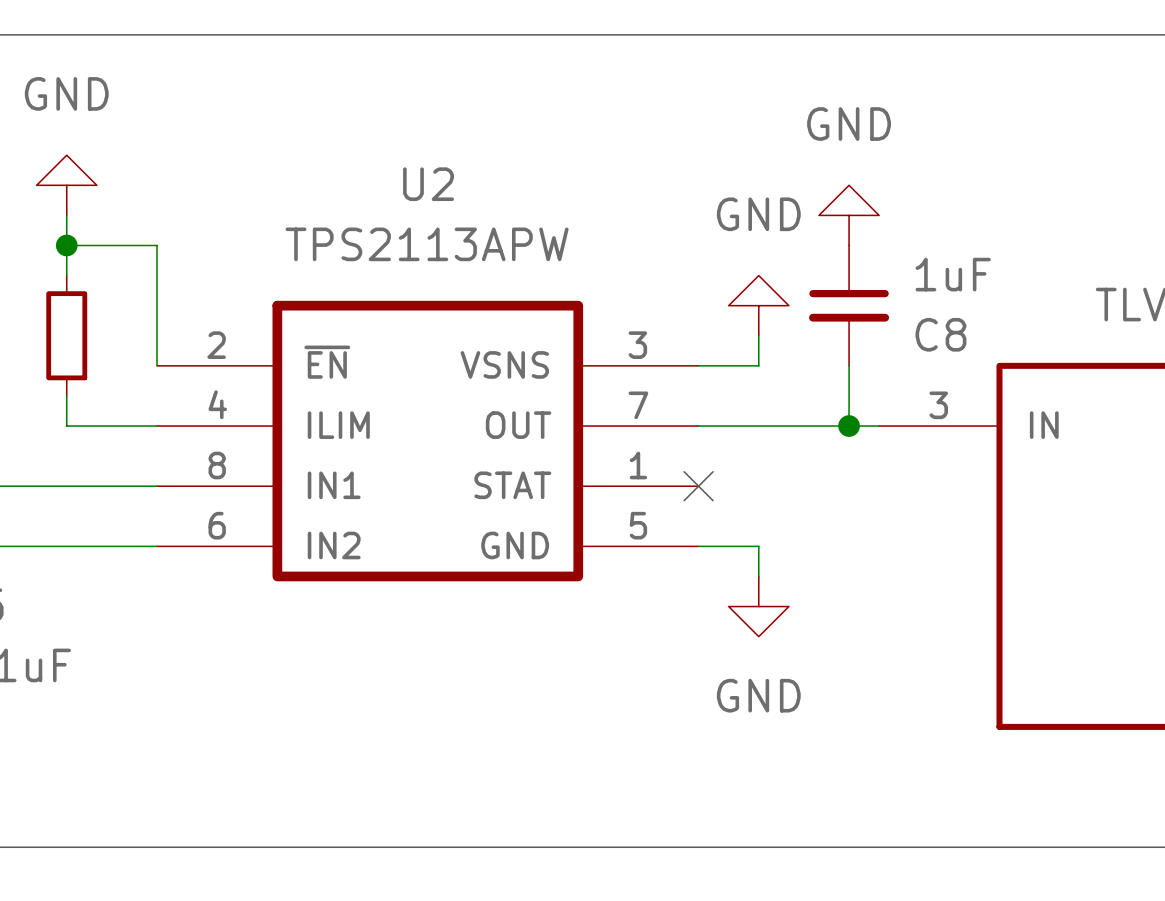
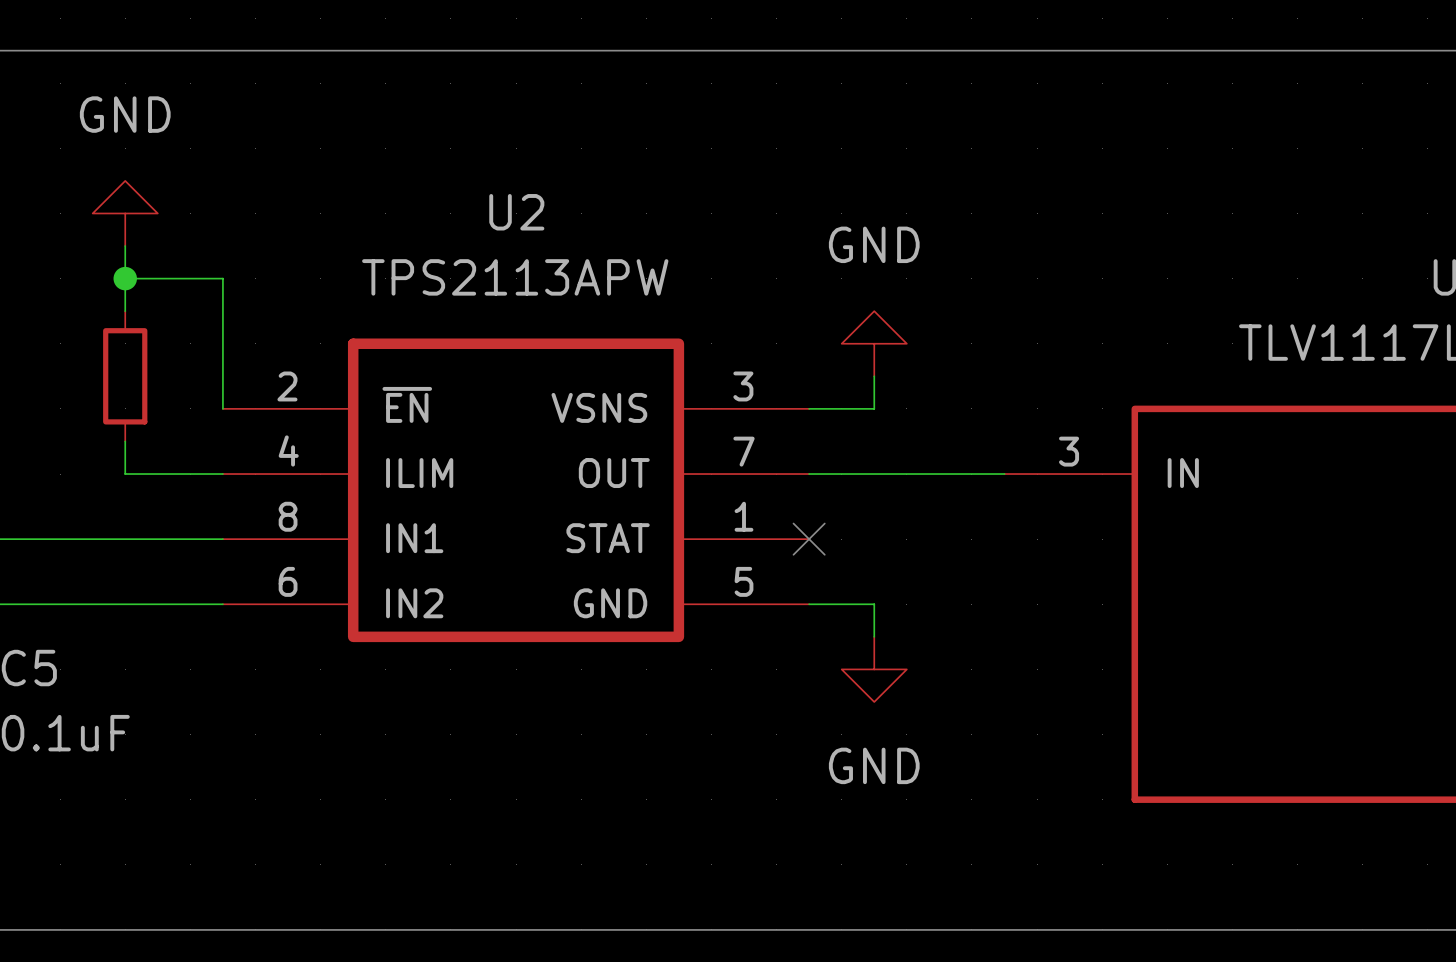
power symbol: GND (849, 215) -> none
C8: 1uF (849, 305) -> none
wire: (849, 365) (849, 426) -> none
junction: (849, 426) -> none

